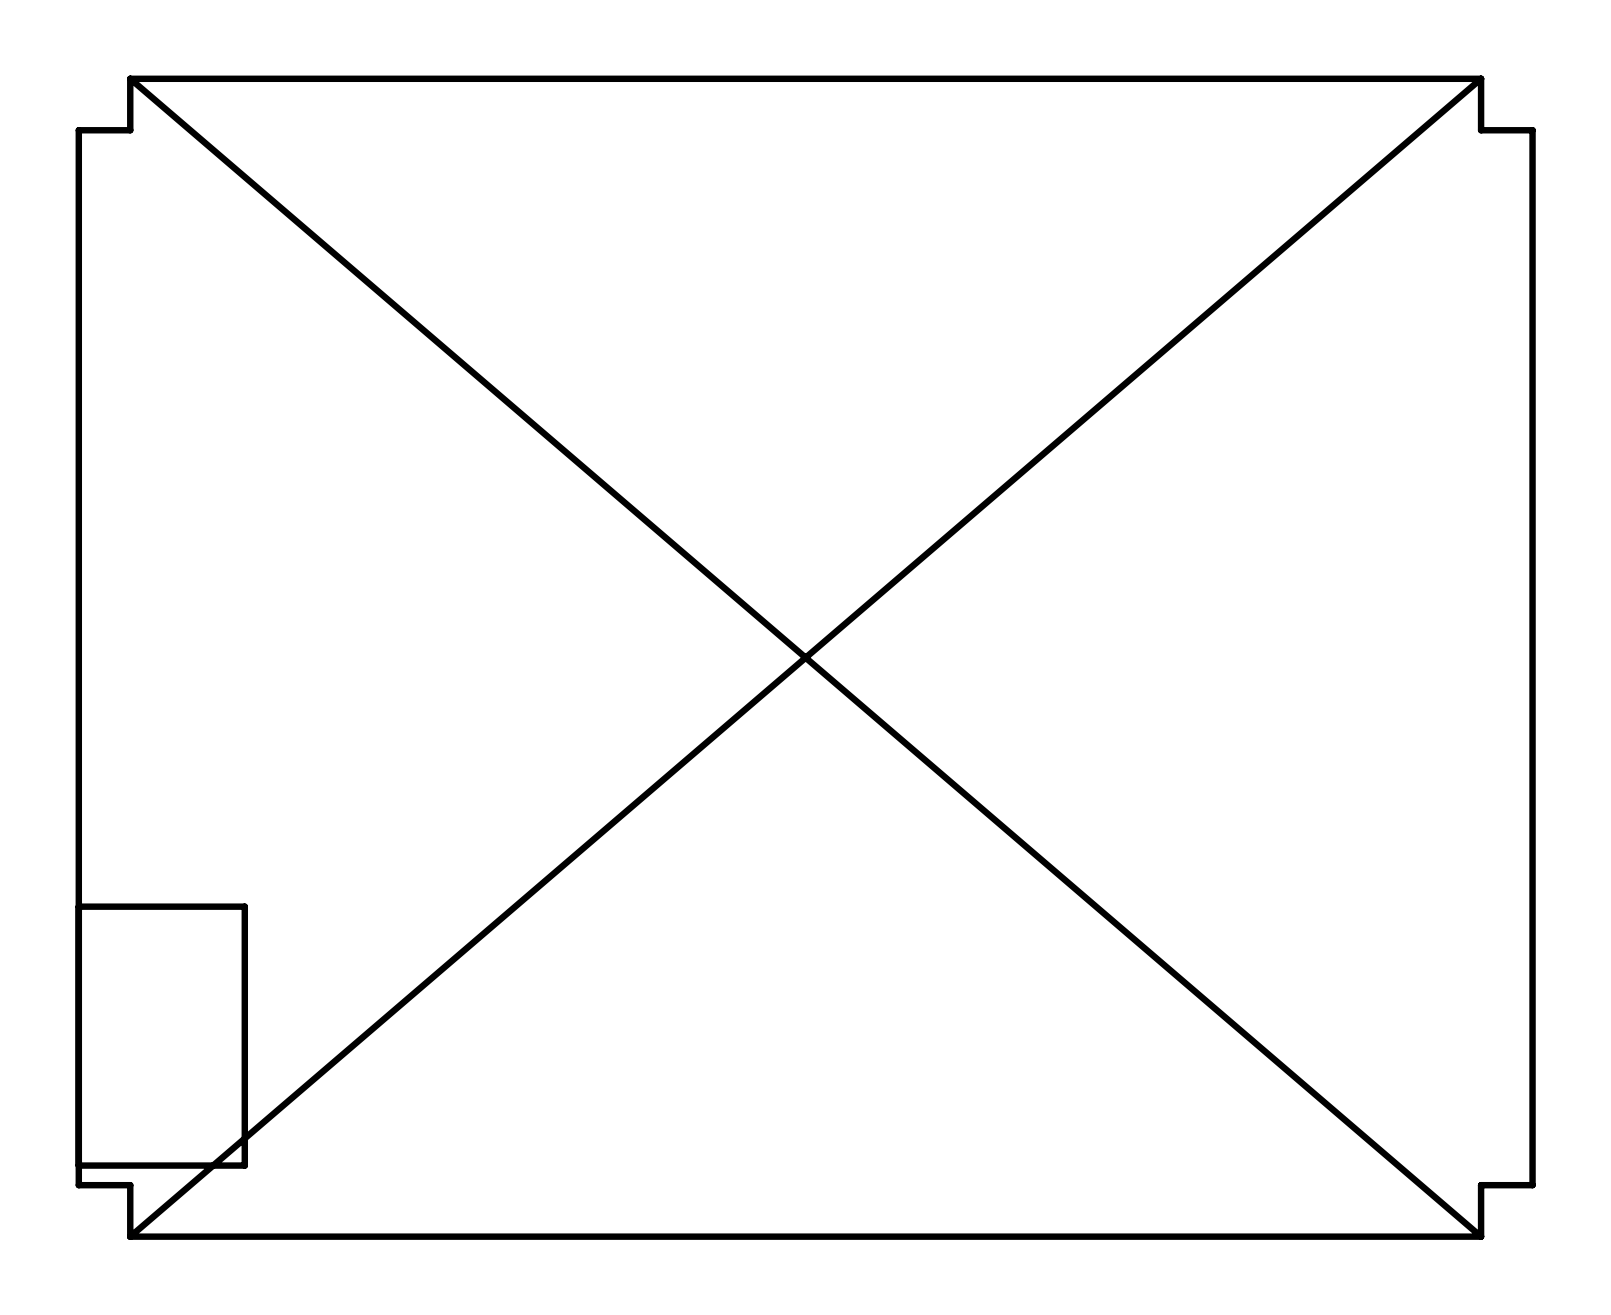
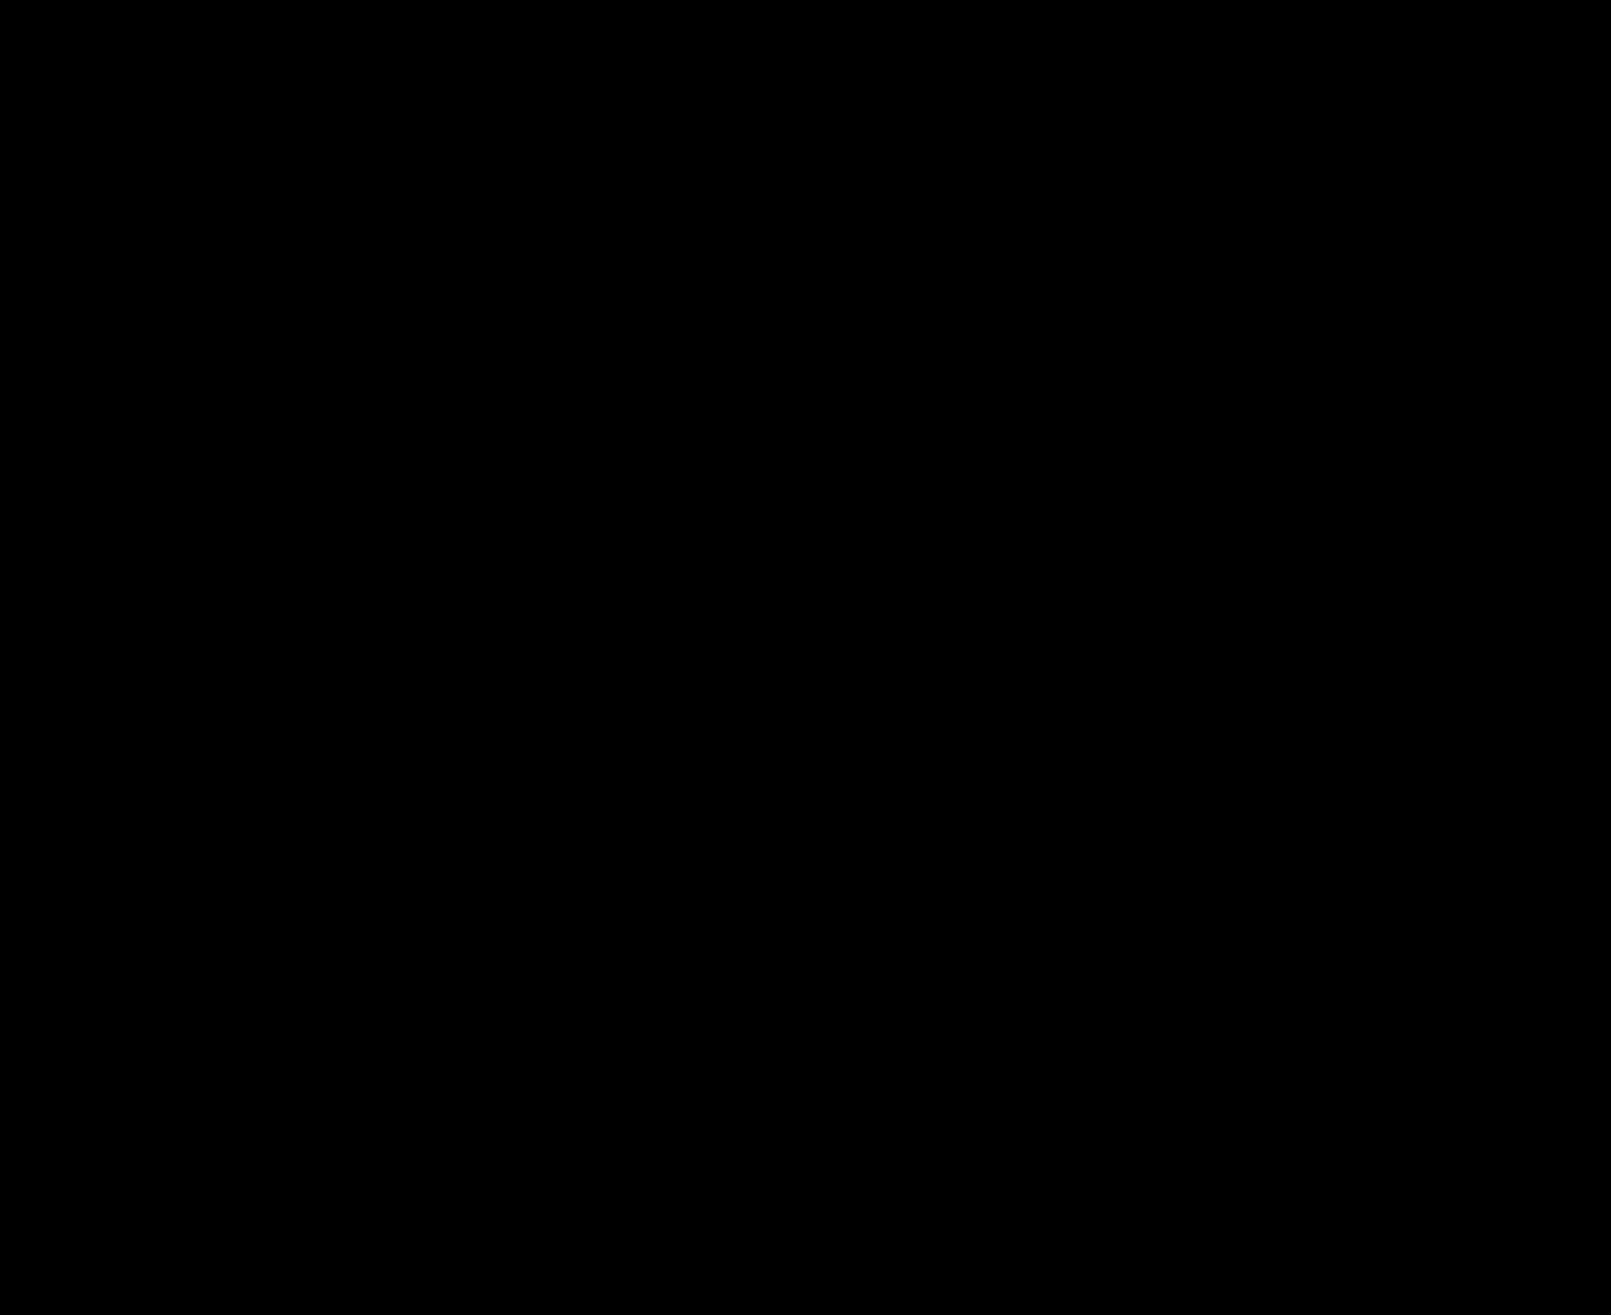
board edge: (130, 78) (1481, 1236) -> none
board edge: (130, 78) (130, 130) (78, 130) (78, 1185) (130, 1185) (130, 1236) -> none
board edge: (130, 78) (1481, 78) -> none
board edge: (1481, 78) (130, 1236) -> none
board edge: (1481, 78) (1481, 130) (1532, 130) (1532, 1185) (1481, 1185) (1481, 1236) -> none
board edge: (78, 906) (244, 906) (244, 1165) (78, 1165) -> none
board edge: (130, 1236) (1481, 1236) -> none

